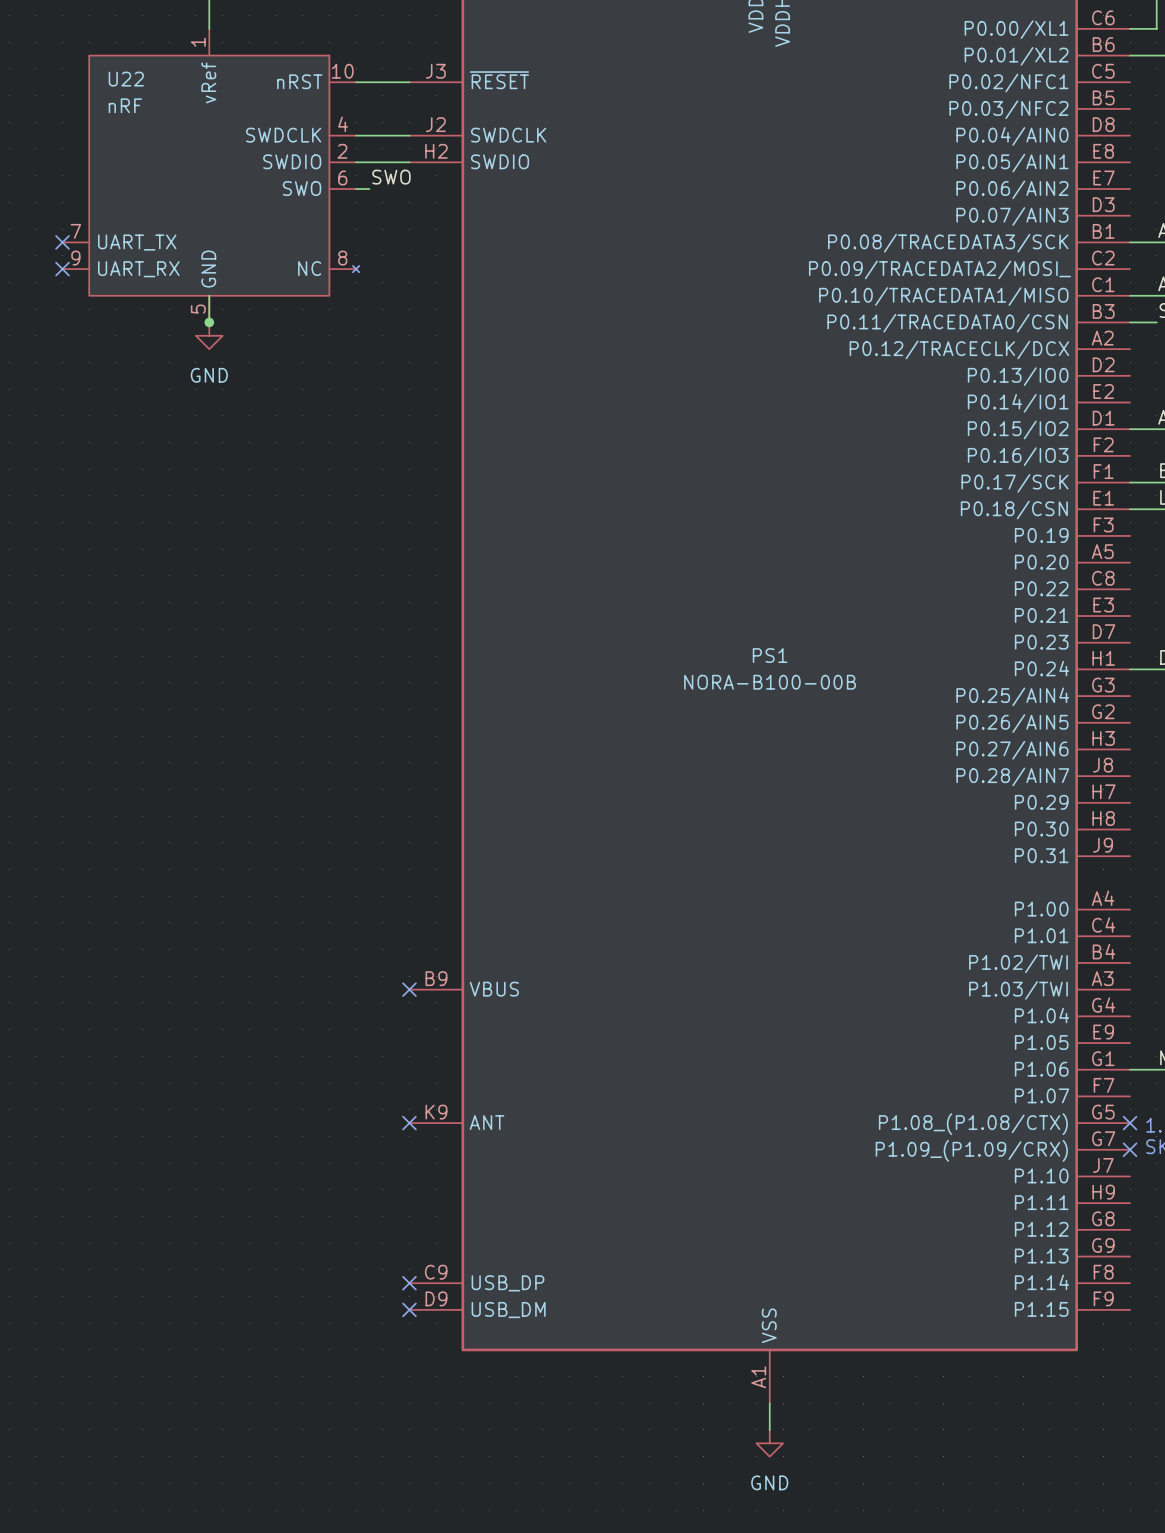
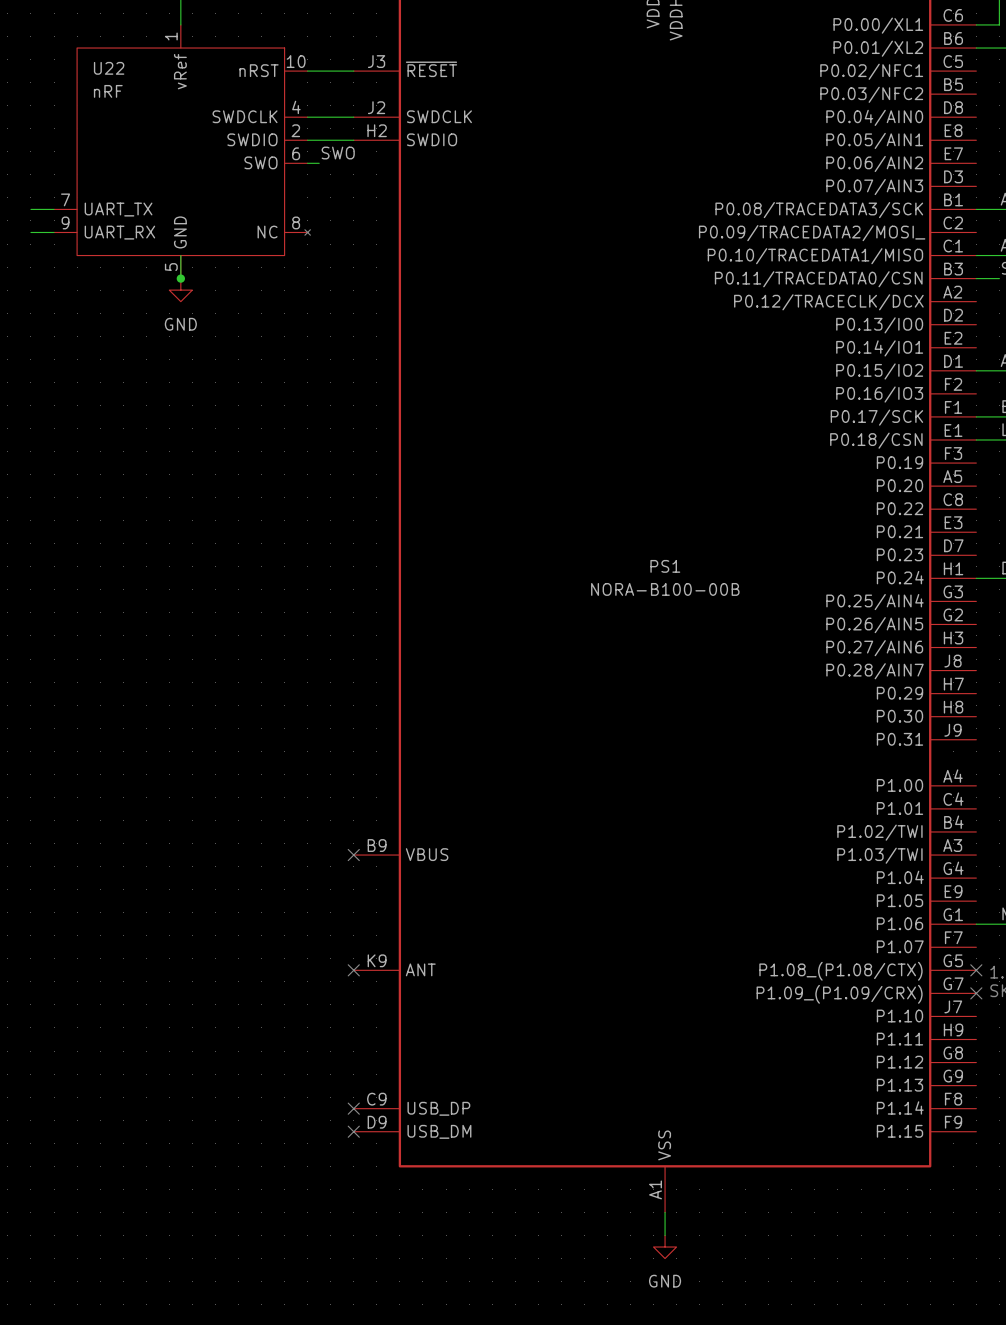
wire: none -> (30, 209) (54, 209)
no-connect mark: (62, 242) -> none
wire: none -> (30, 232) (54, 232)
no-connect mark: (62, 269) -> none

